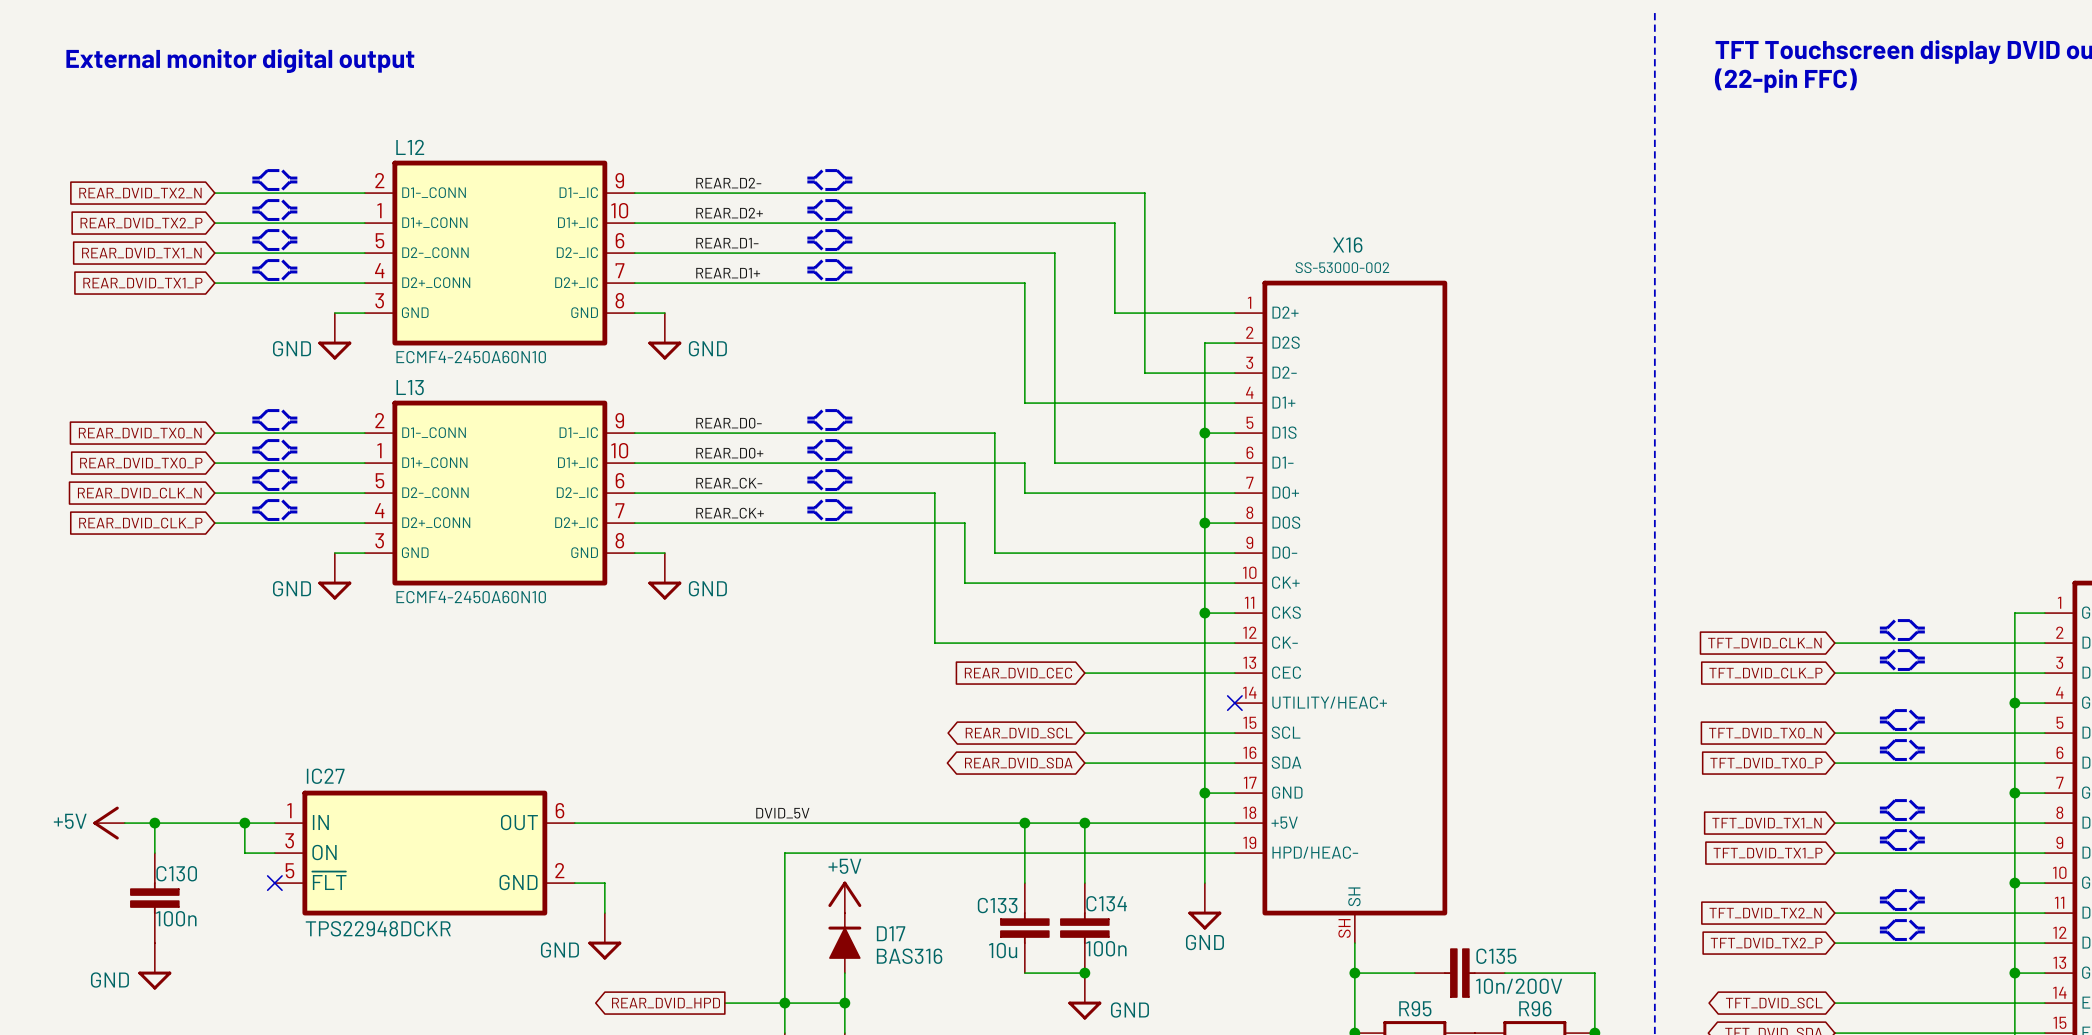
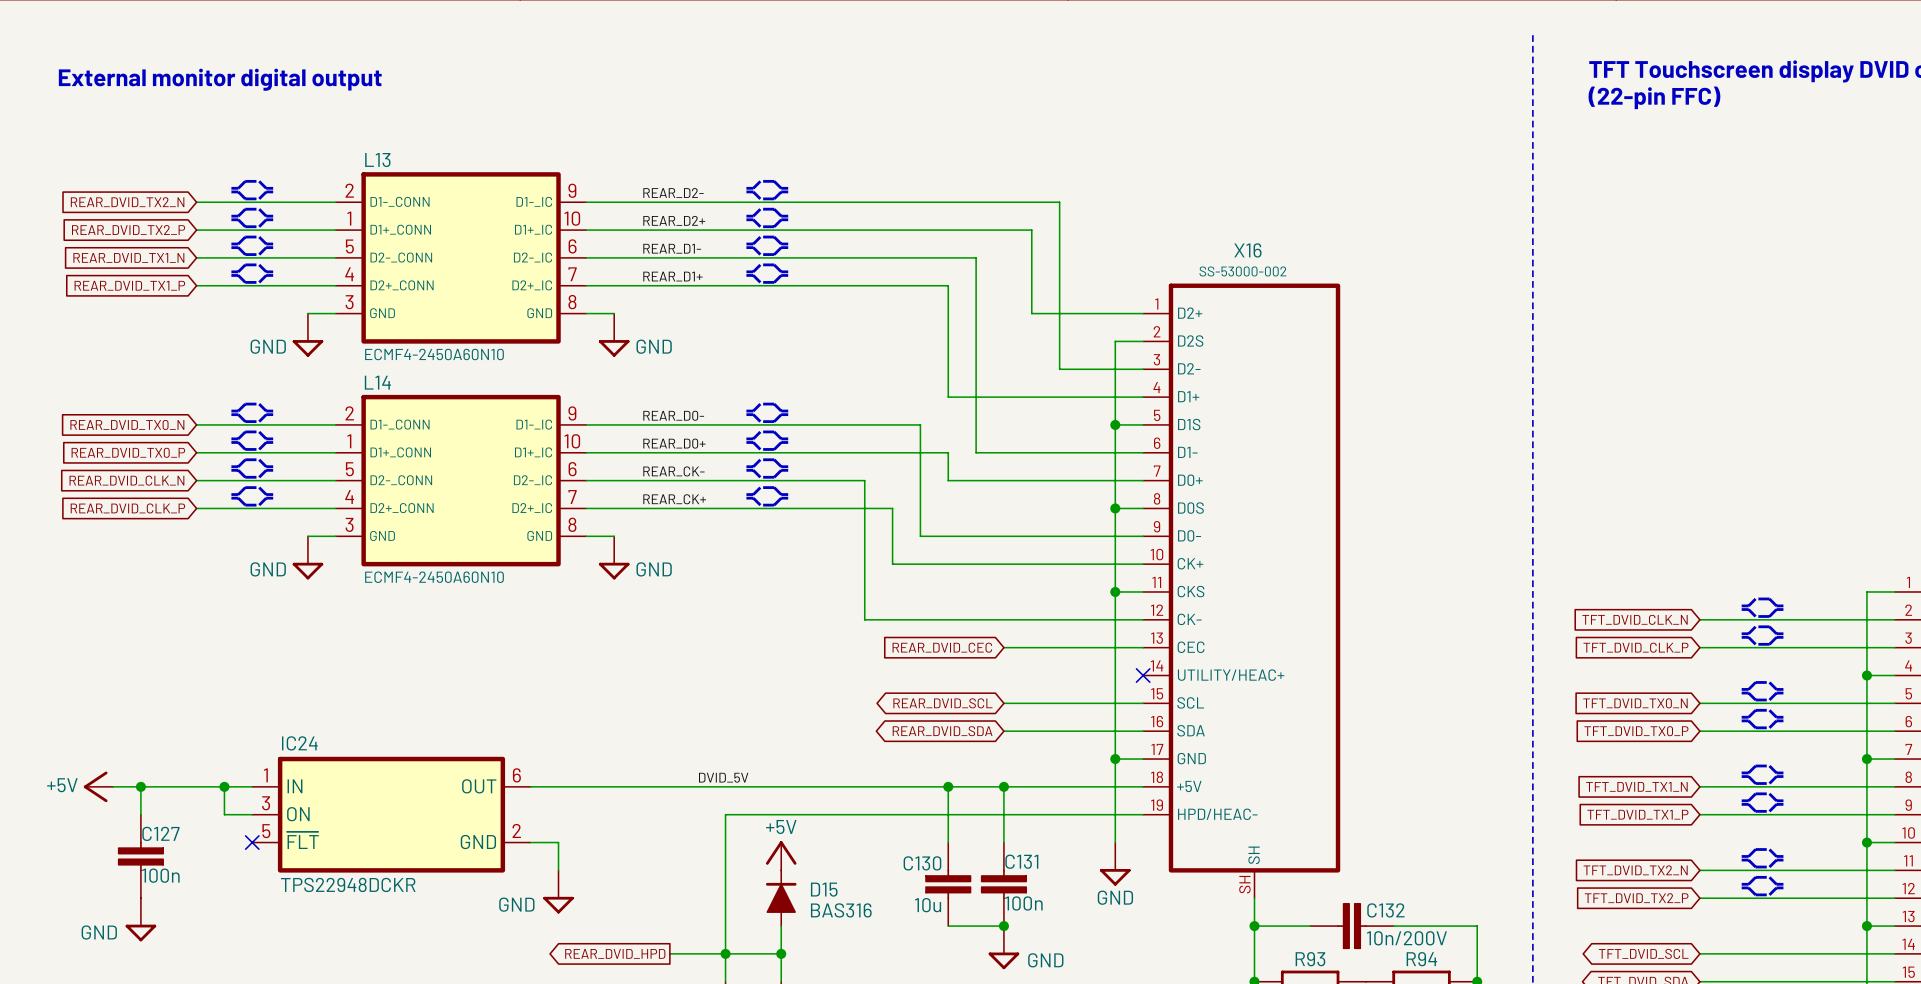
L12 name: L12 (410, 147) -> L13 (377, 160)
L13 name: L13 (410, 387) -> L14 (377, 382)
IC27 name: IC27 (325, 776) -> IC24 (299, 743)
C130 name: C130 (176, 873) -> C127 (160, 833)
C134 name: C134 (1106, 903) -> C131 (1021, 861)
C133 name: C133 (997, 905) -> C130 (922, 863)
D17 name: D17 (891, 933) -> D15 (824, 889)
C135 name: C135 (1496, 956) -> C132 (1385, 910)
R95 name: R95 (1415, 1008) -> R93 (1310, 959)
R96 name: R96 (1535, 1008) -> R94 (1421, 959)

